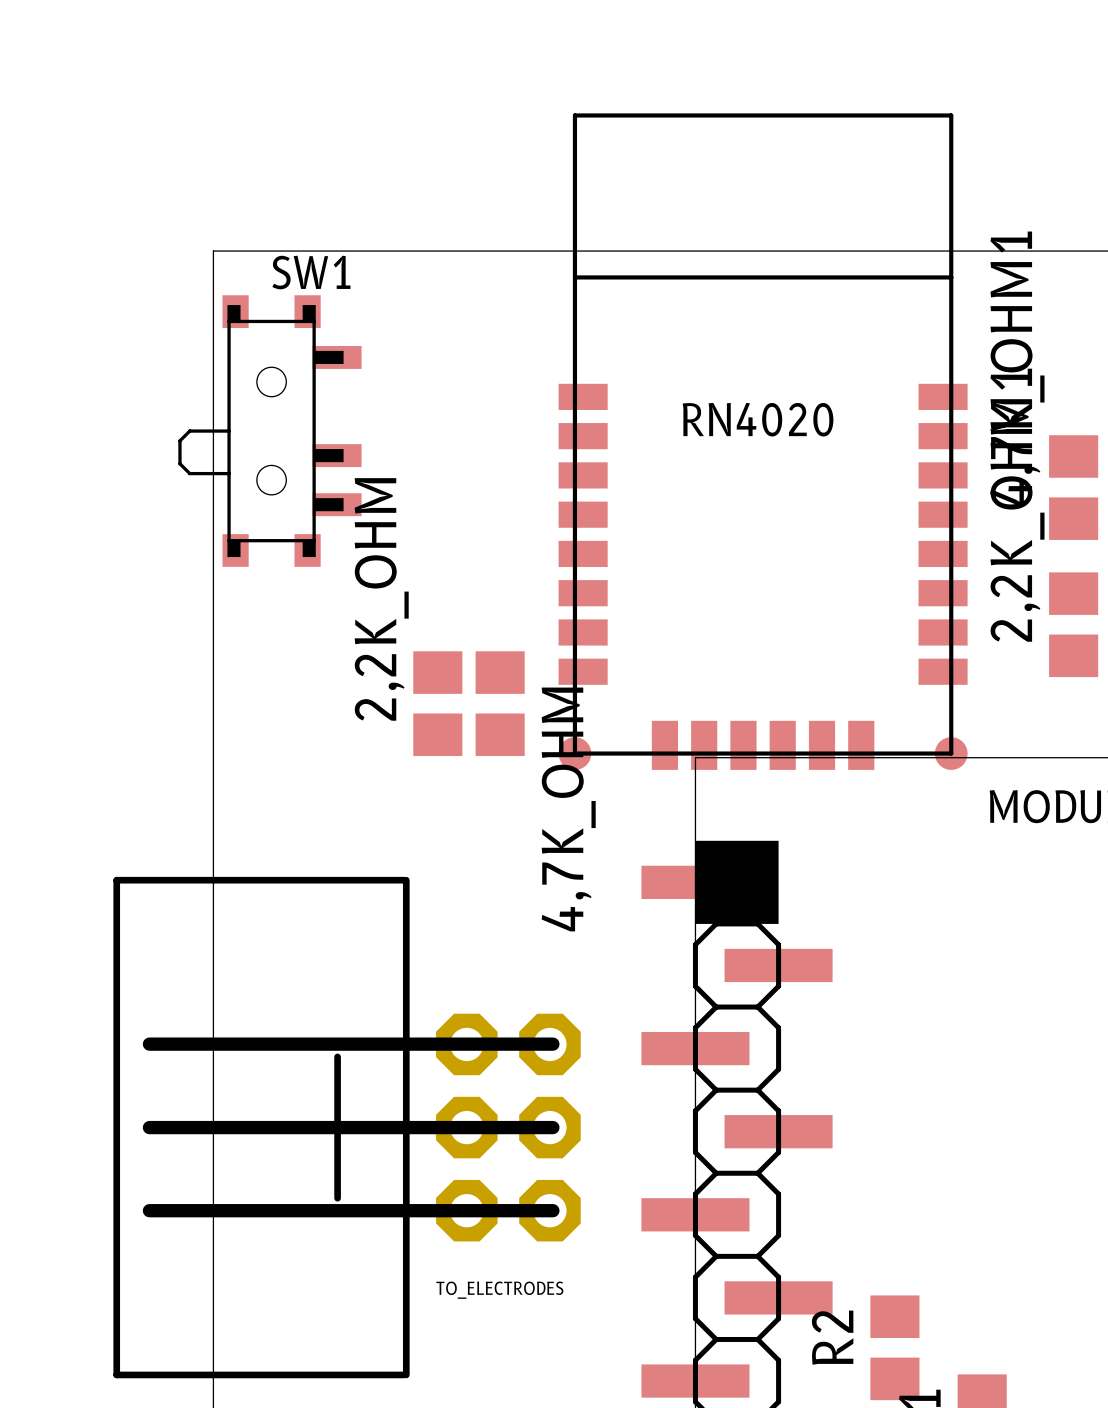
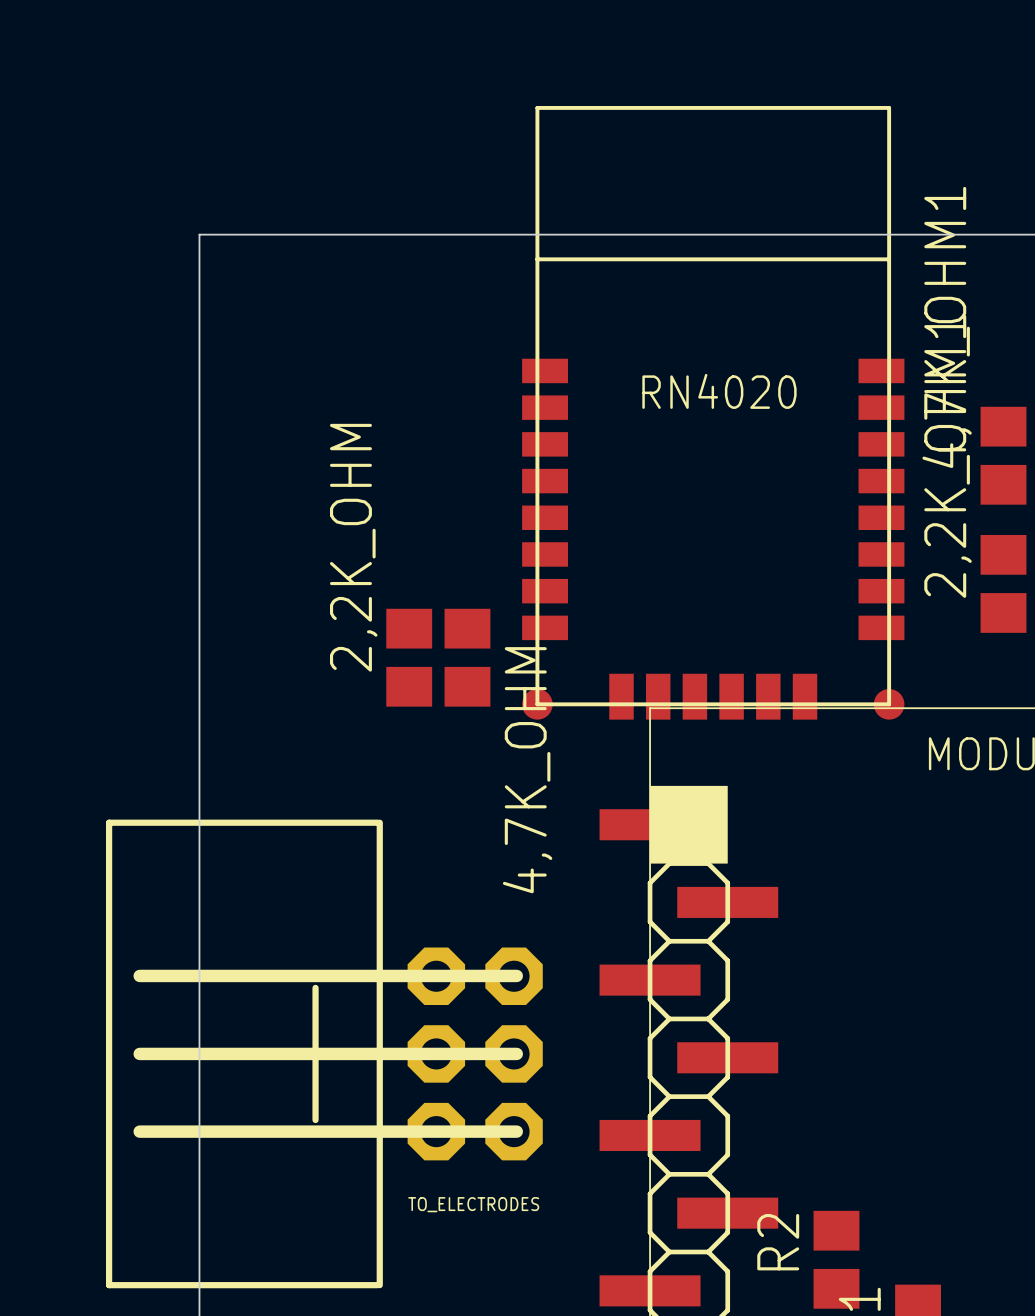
SW1: (269, 431) -> none

